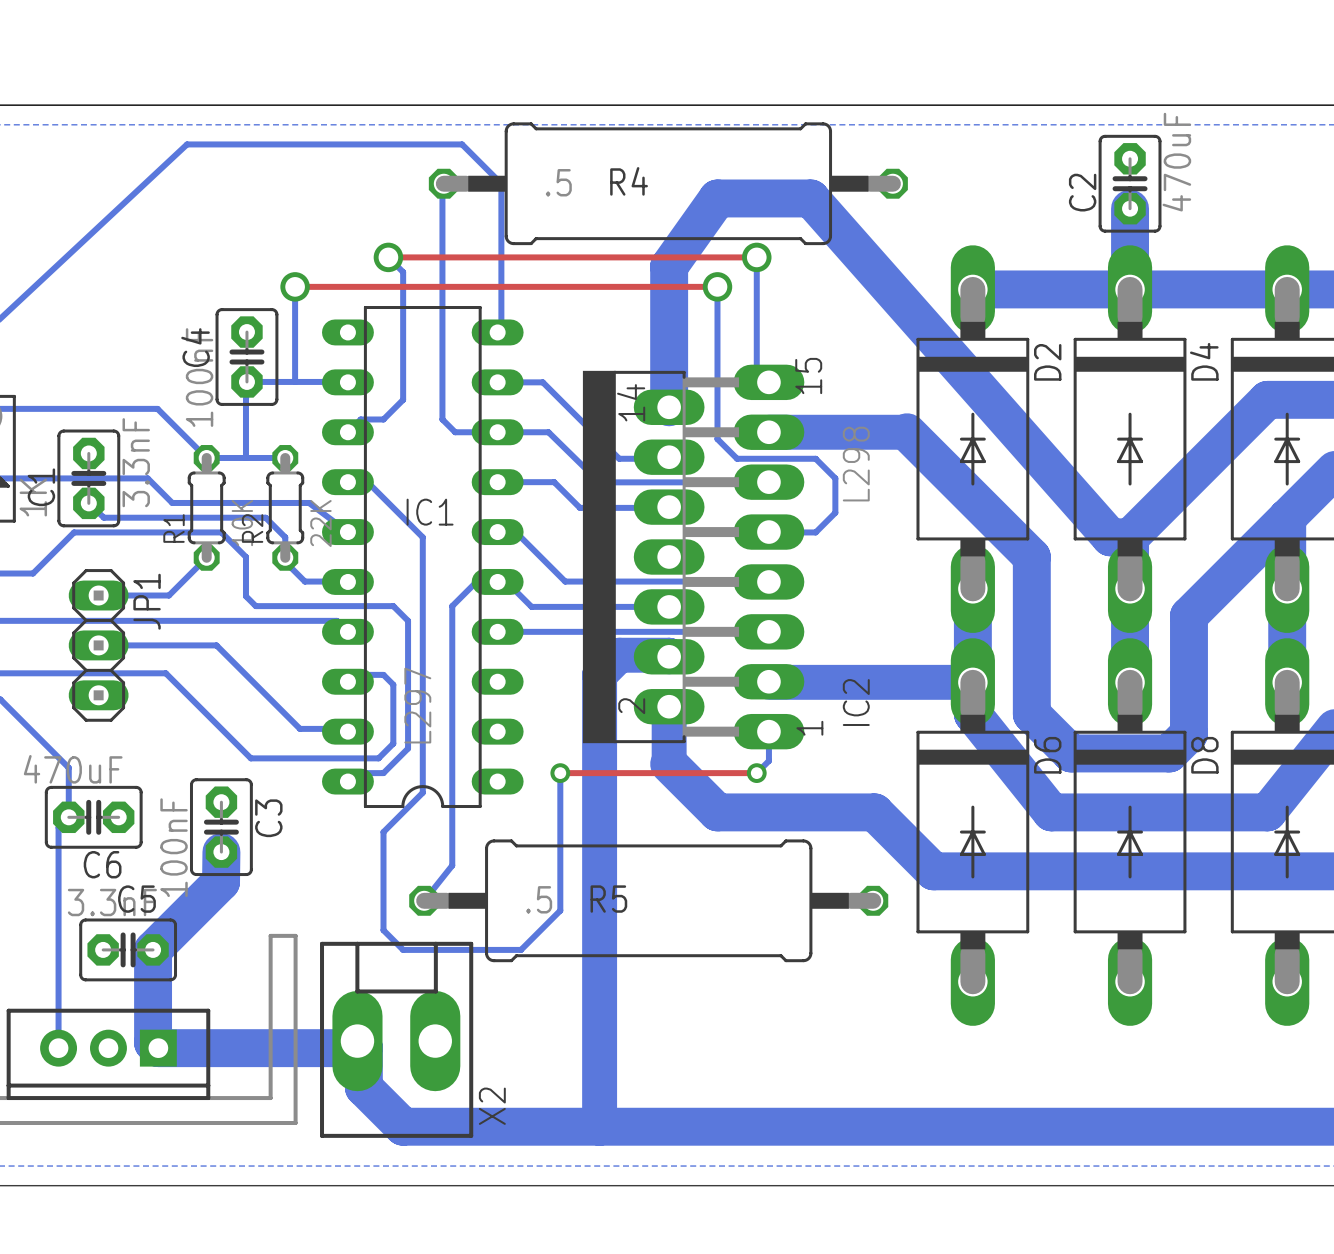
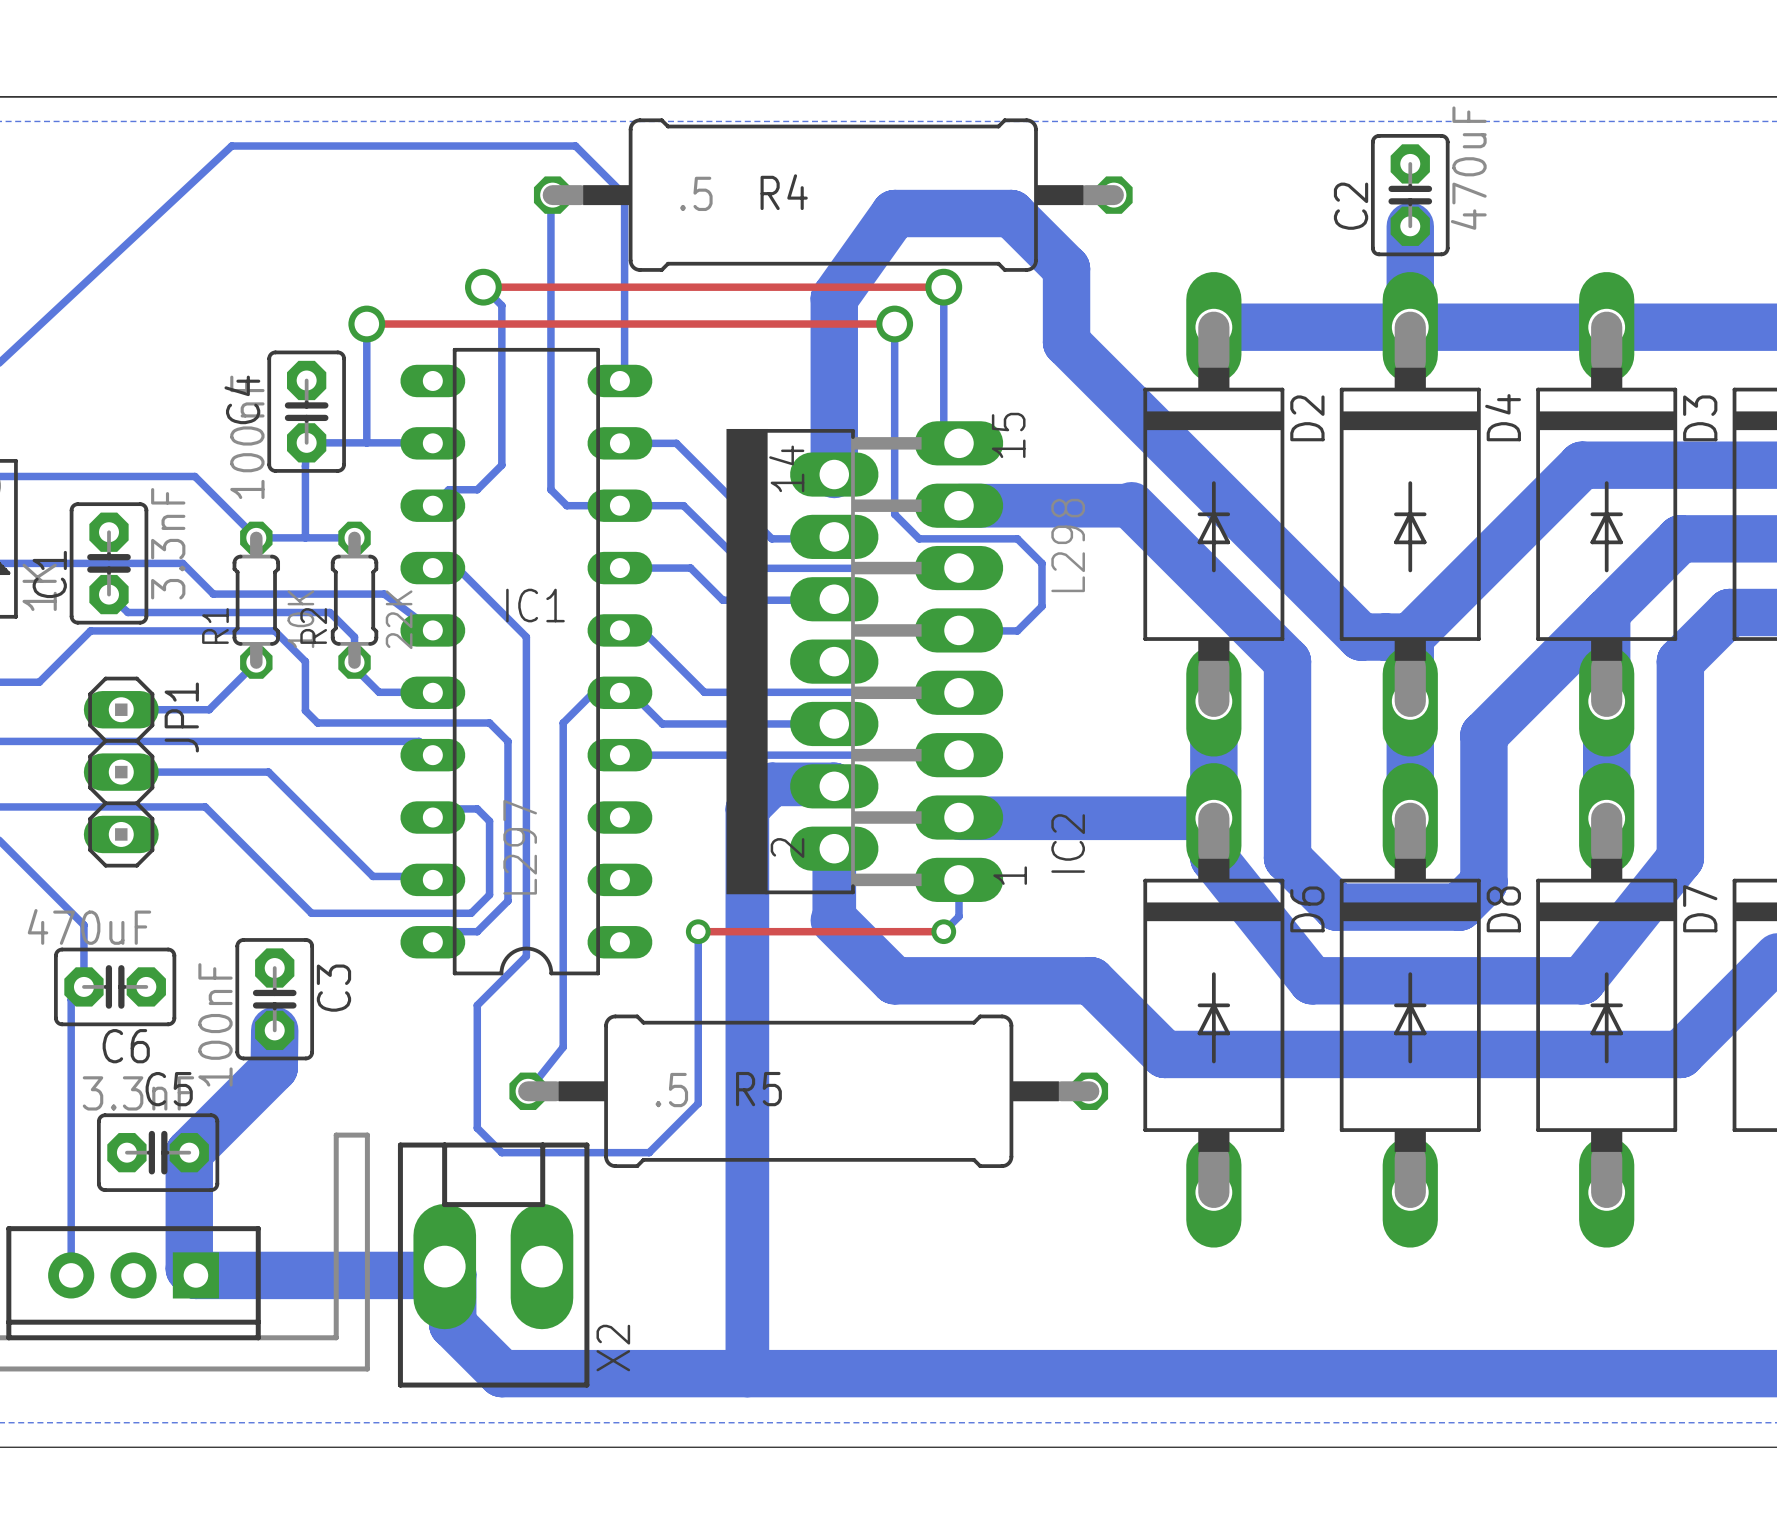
bottom track: (810, 198) (1110, 537) -> (1011, 213) (1066, 268) (1066, 342) (1361, 637) (1385, 637)

